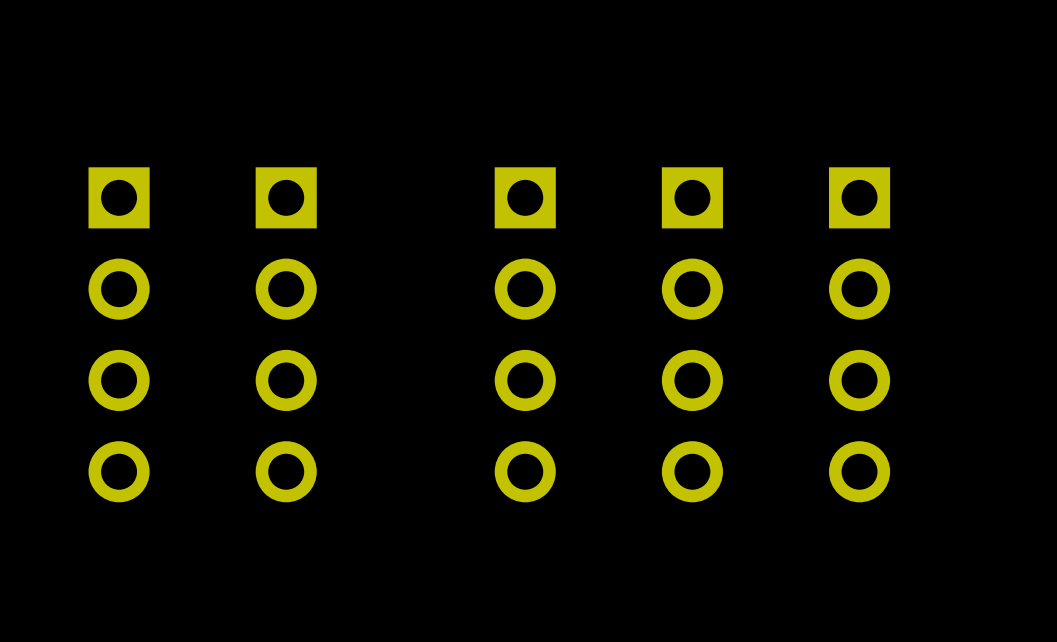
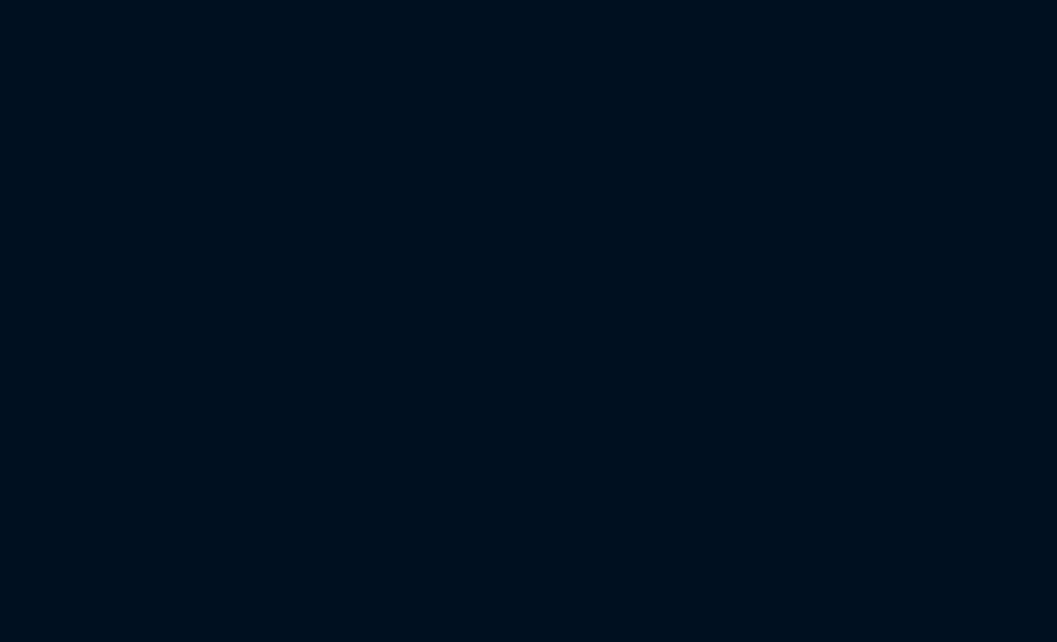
part: (119, 334) -> none
part: (286, 334) -> none
part: (525, 334) -> none
part: (692, 334) -> none
part: (859, 334) -> none

